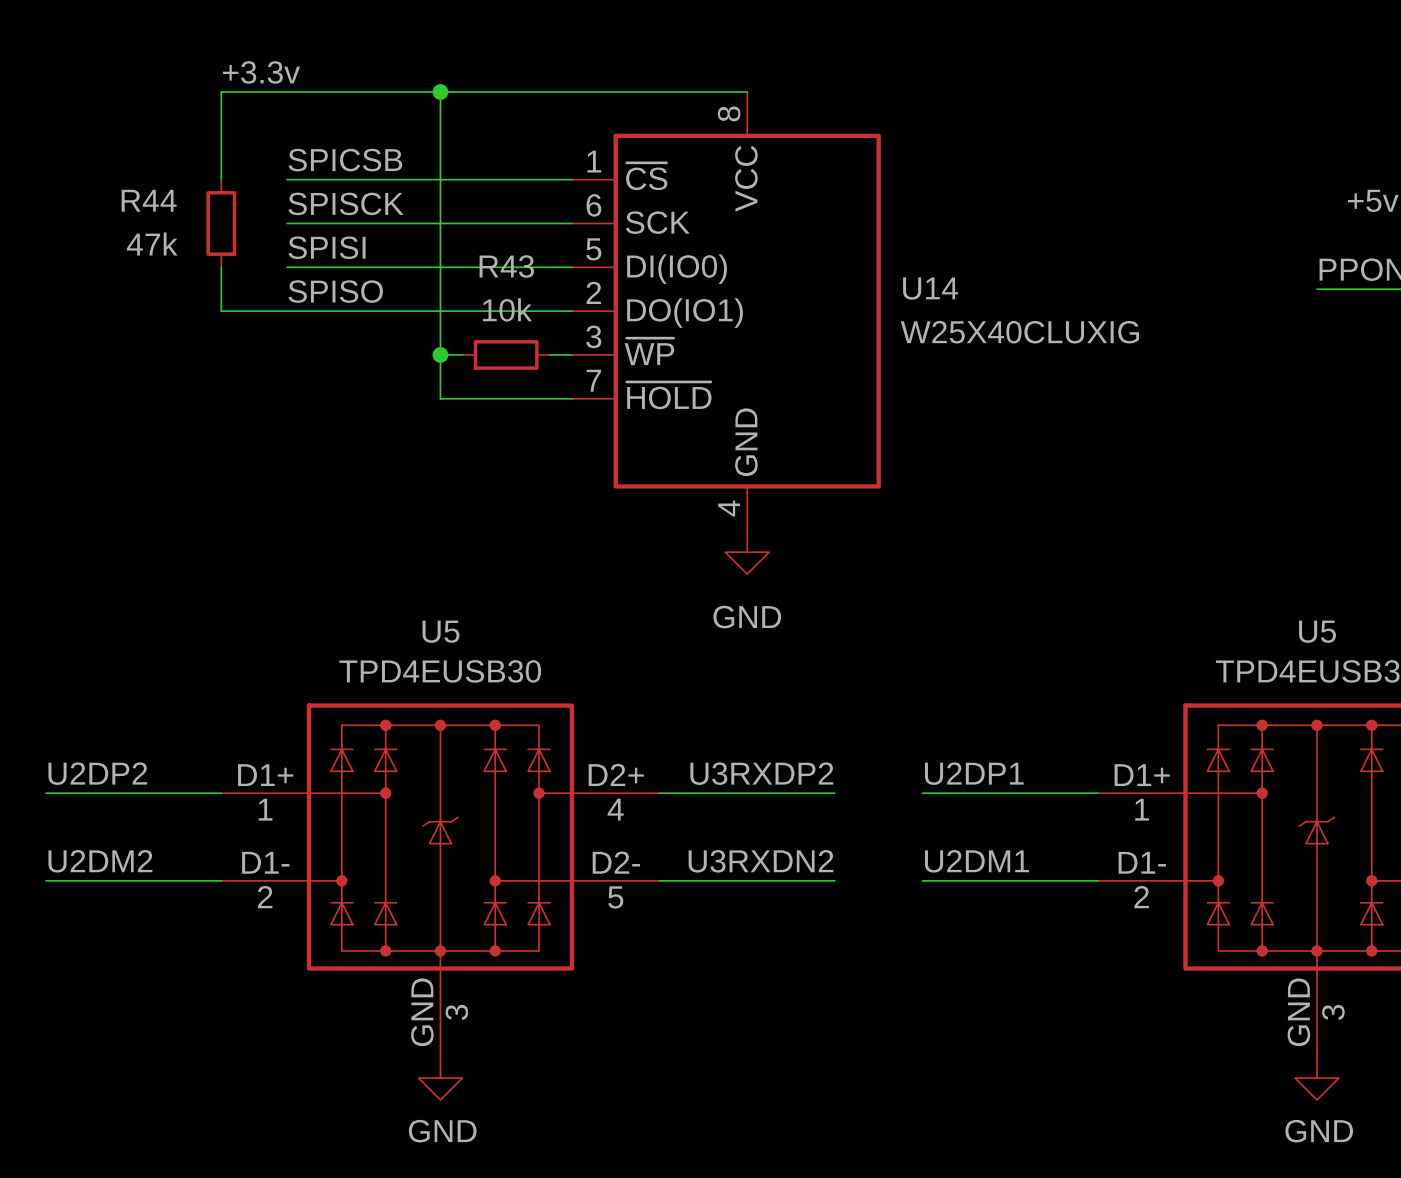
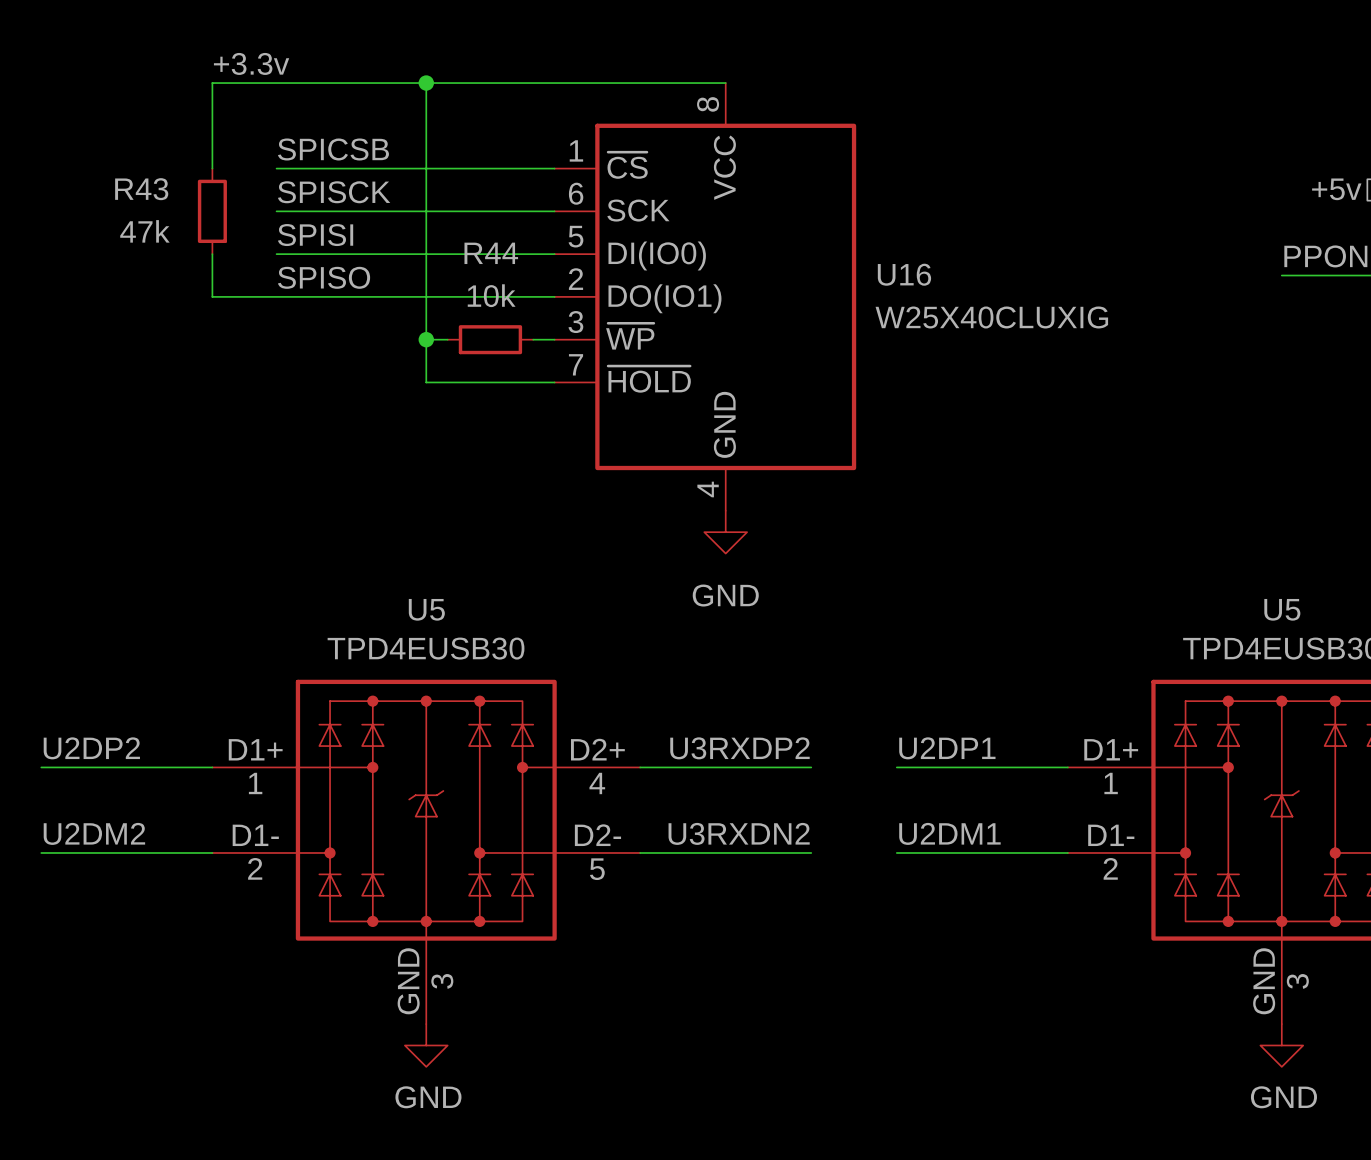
R44 name: R44 (149, 200) -> R43 (141, 189)
R43 name: R43 (506, 266) -> R44 (491, 253)
U14 name: U14 (930, 288) -> U16 (904, 274)

